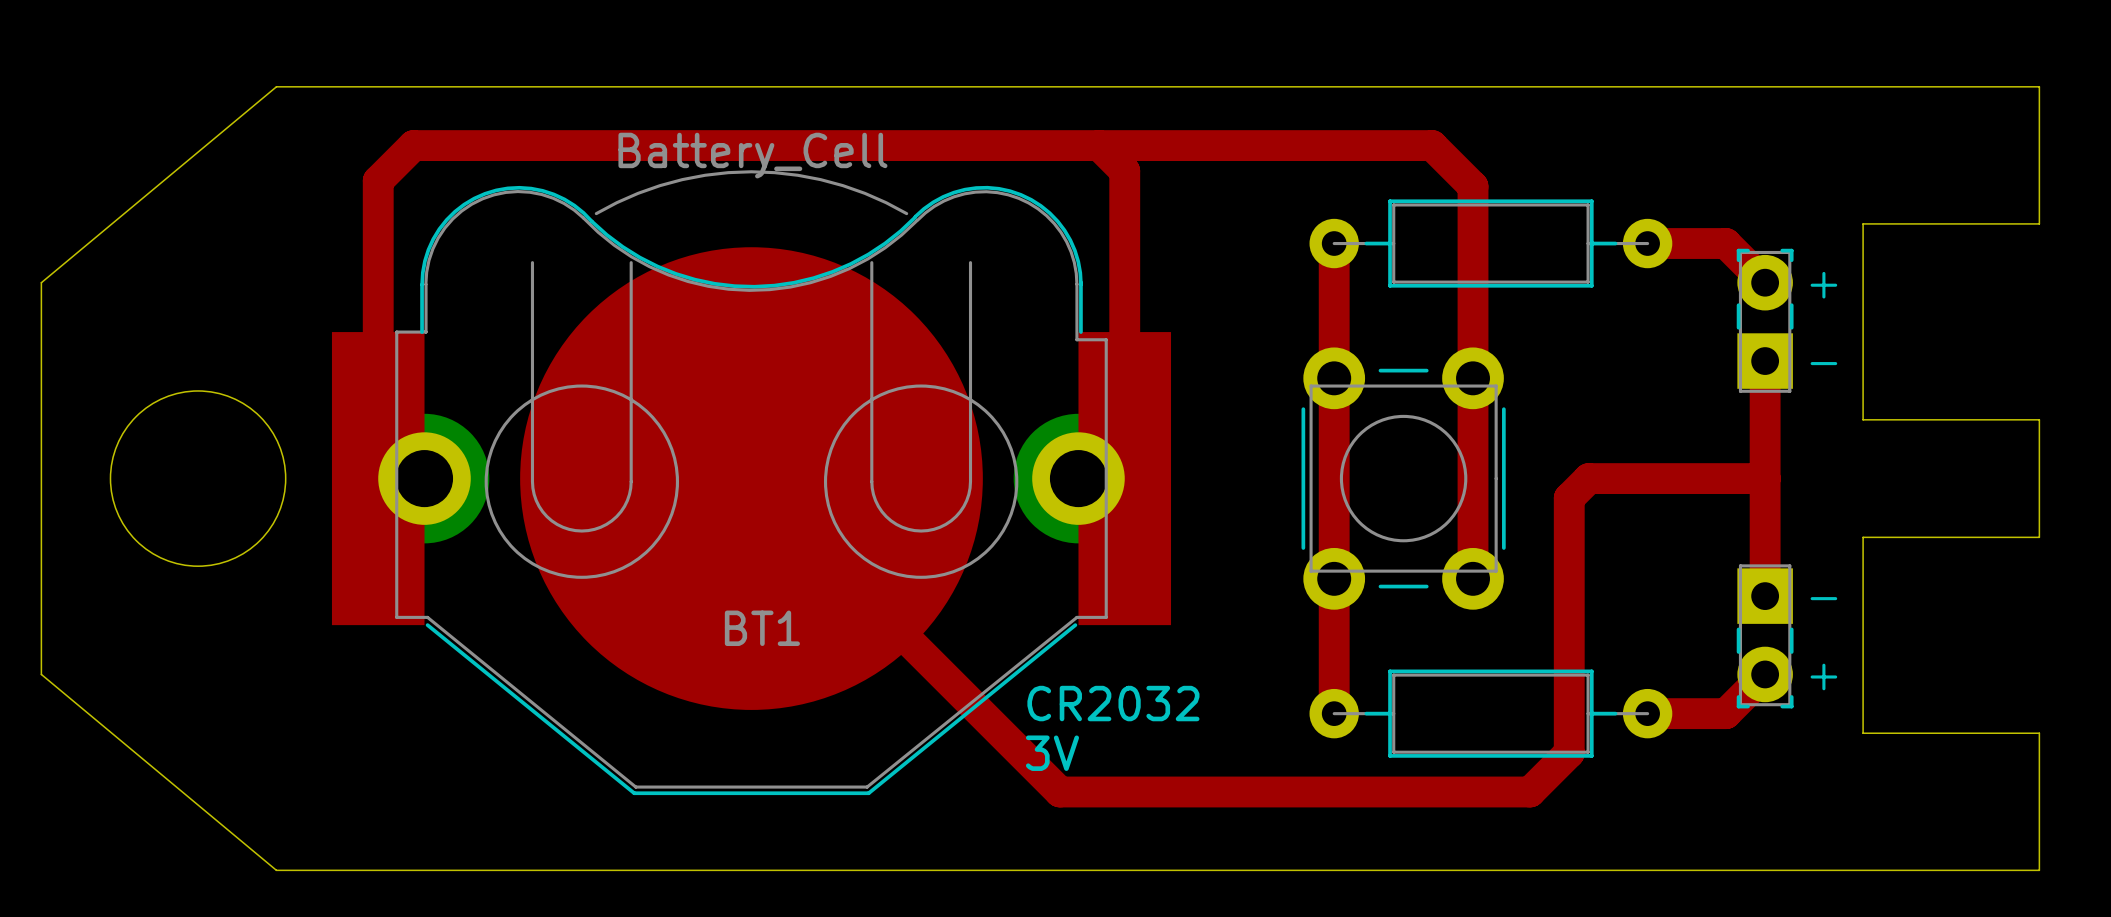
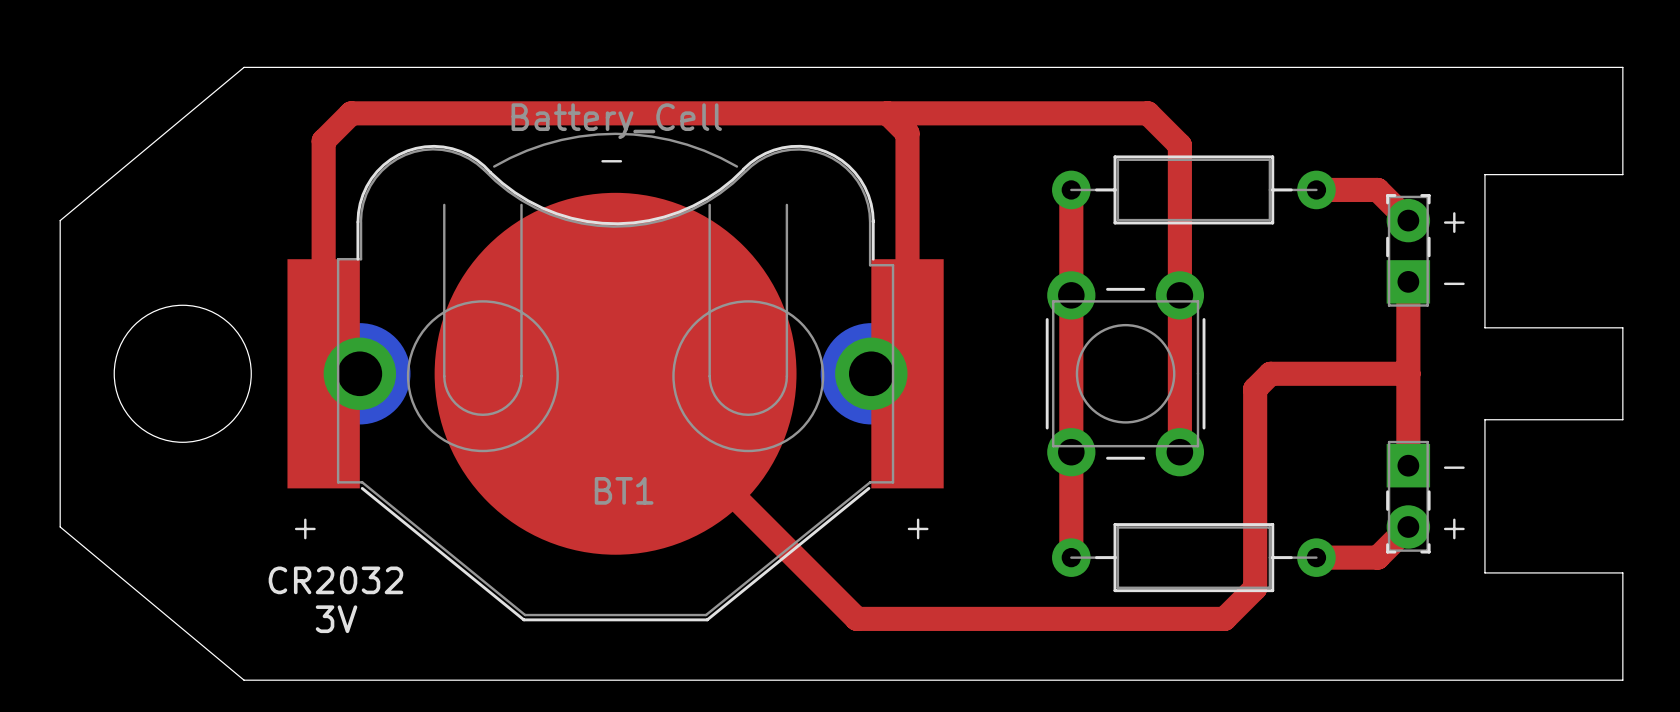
text: none -> - (611, 161)
text: none -> + (305, 528)
text: none -> + (918, 528)
text position: CR2032 (1113, 703) -> CR2032 (335, 580)
text position: 3V (1052, 753) -> 3V (336, 619)

